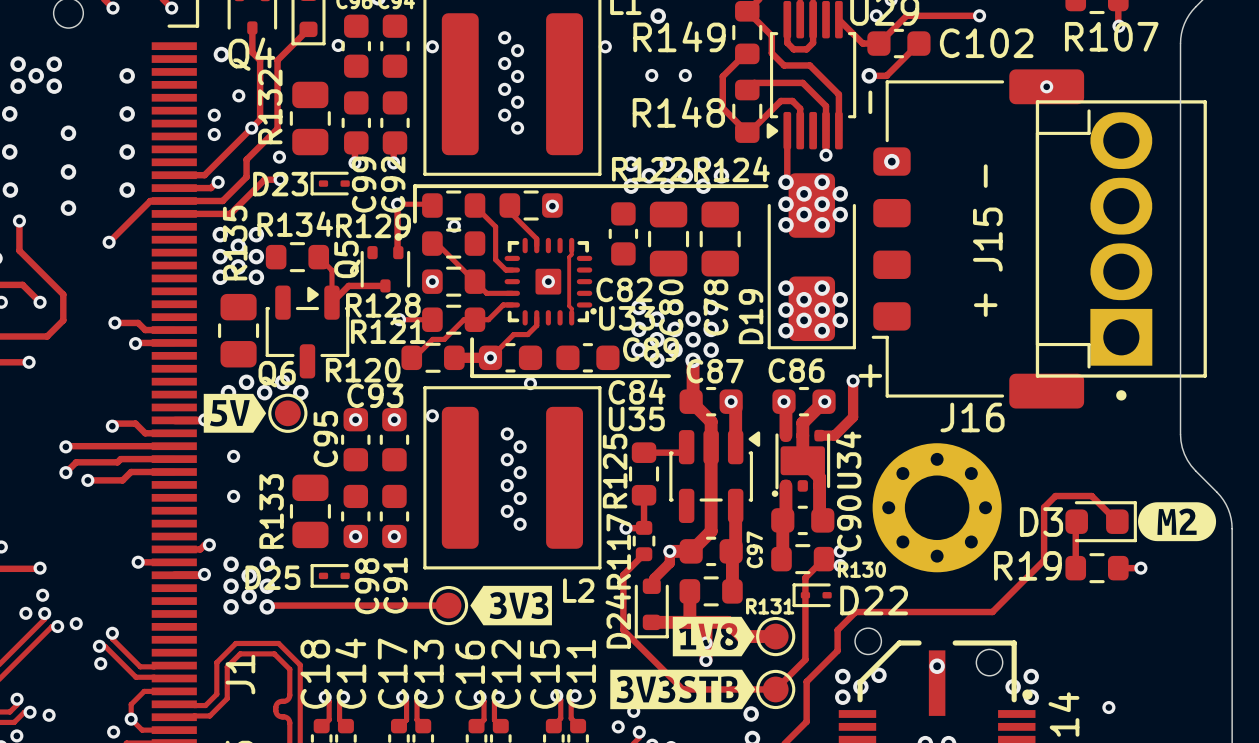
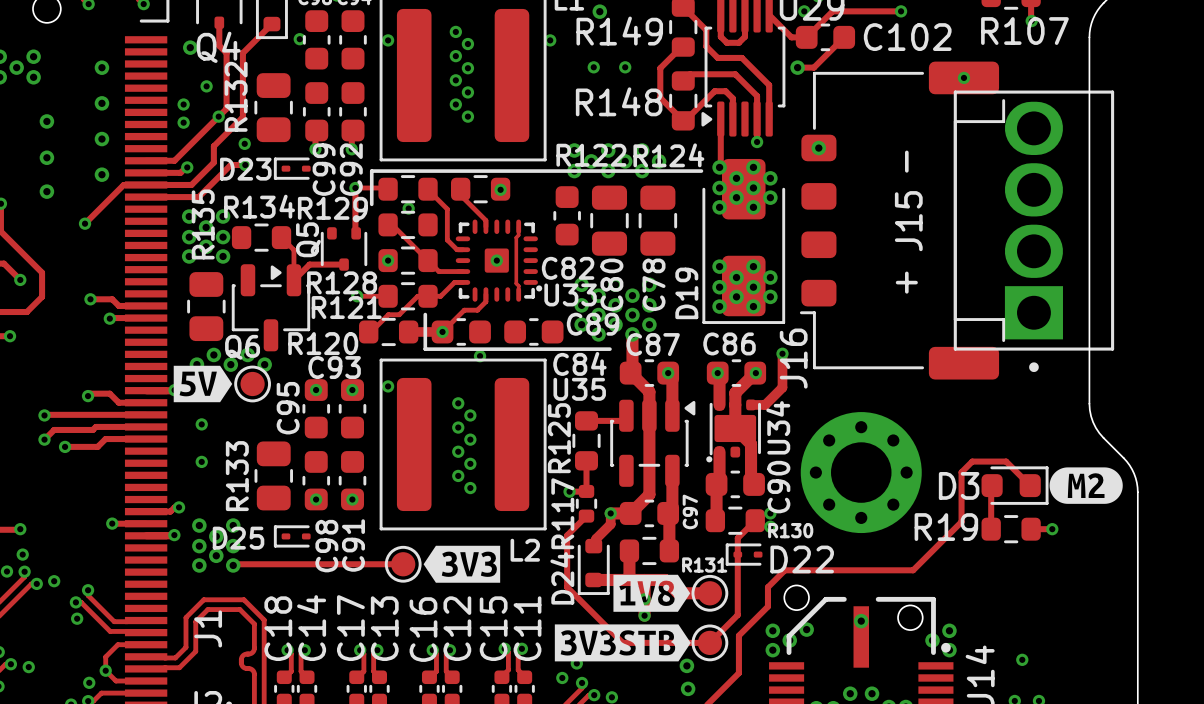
text: - (870, 102) -> none
text: + (870, 375) -> none
J16 name rotation: 0° (972, 417) -> 90° counterclockwise (793, 358)
J16 name position: J16 (972, 417) -> J16 (793, 358)

